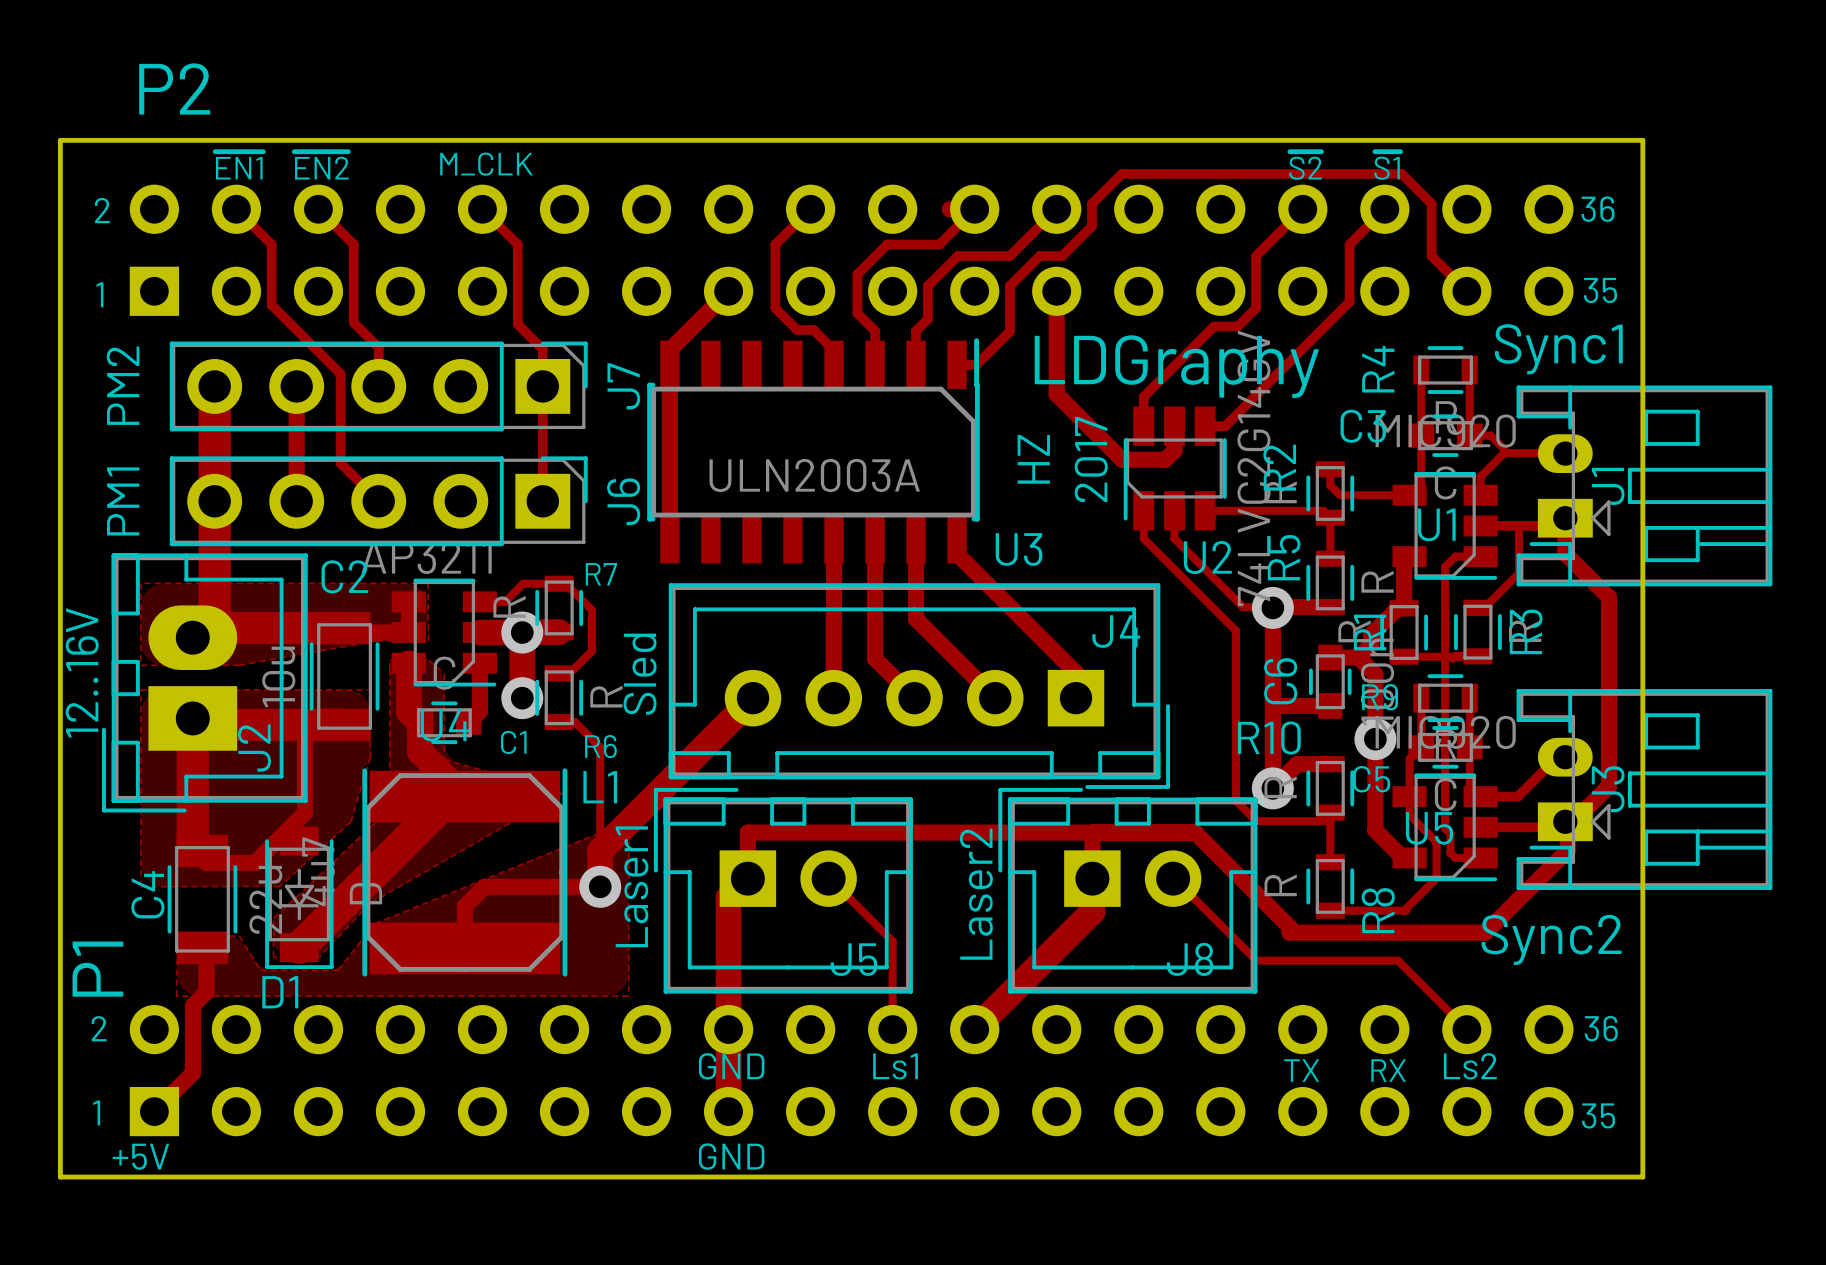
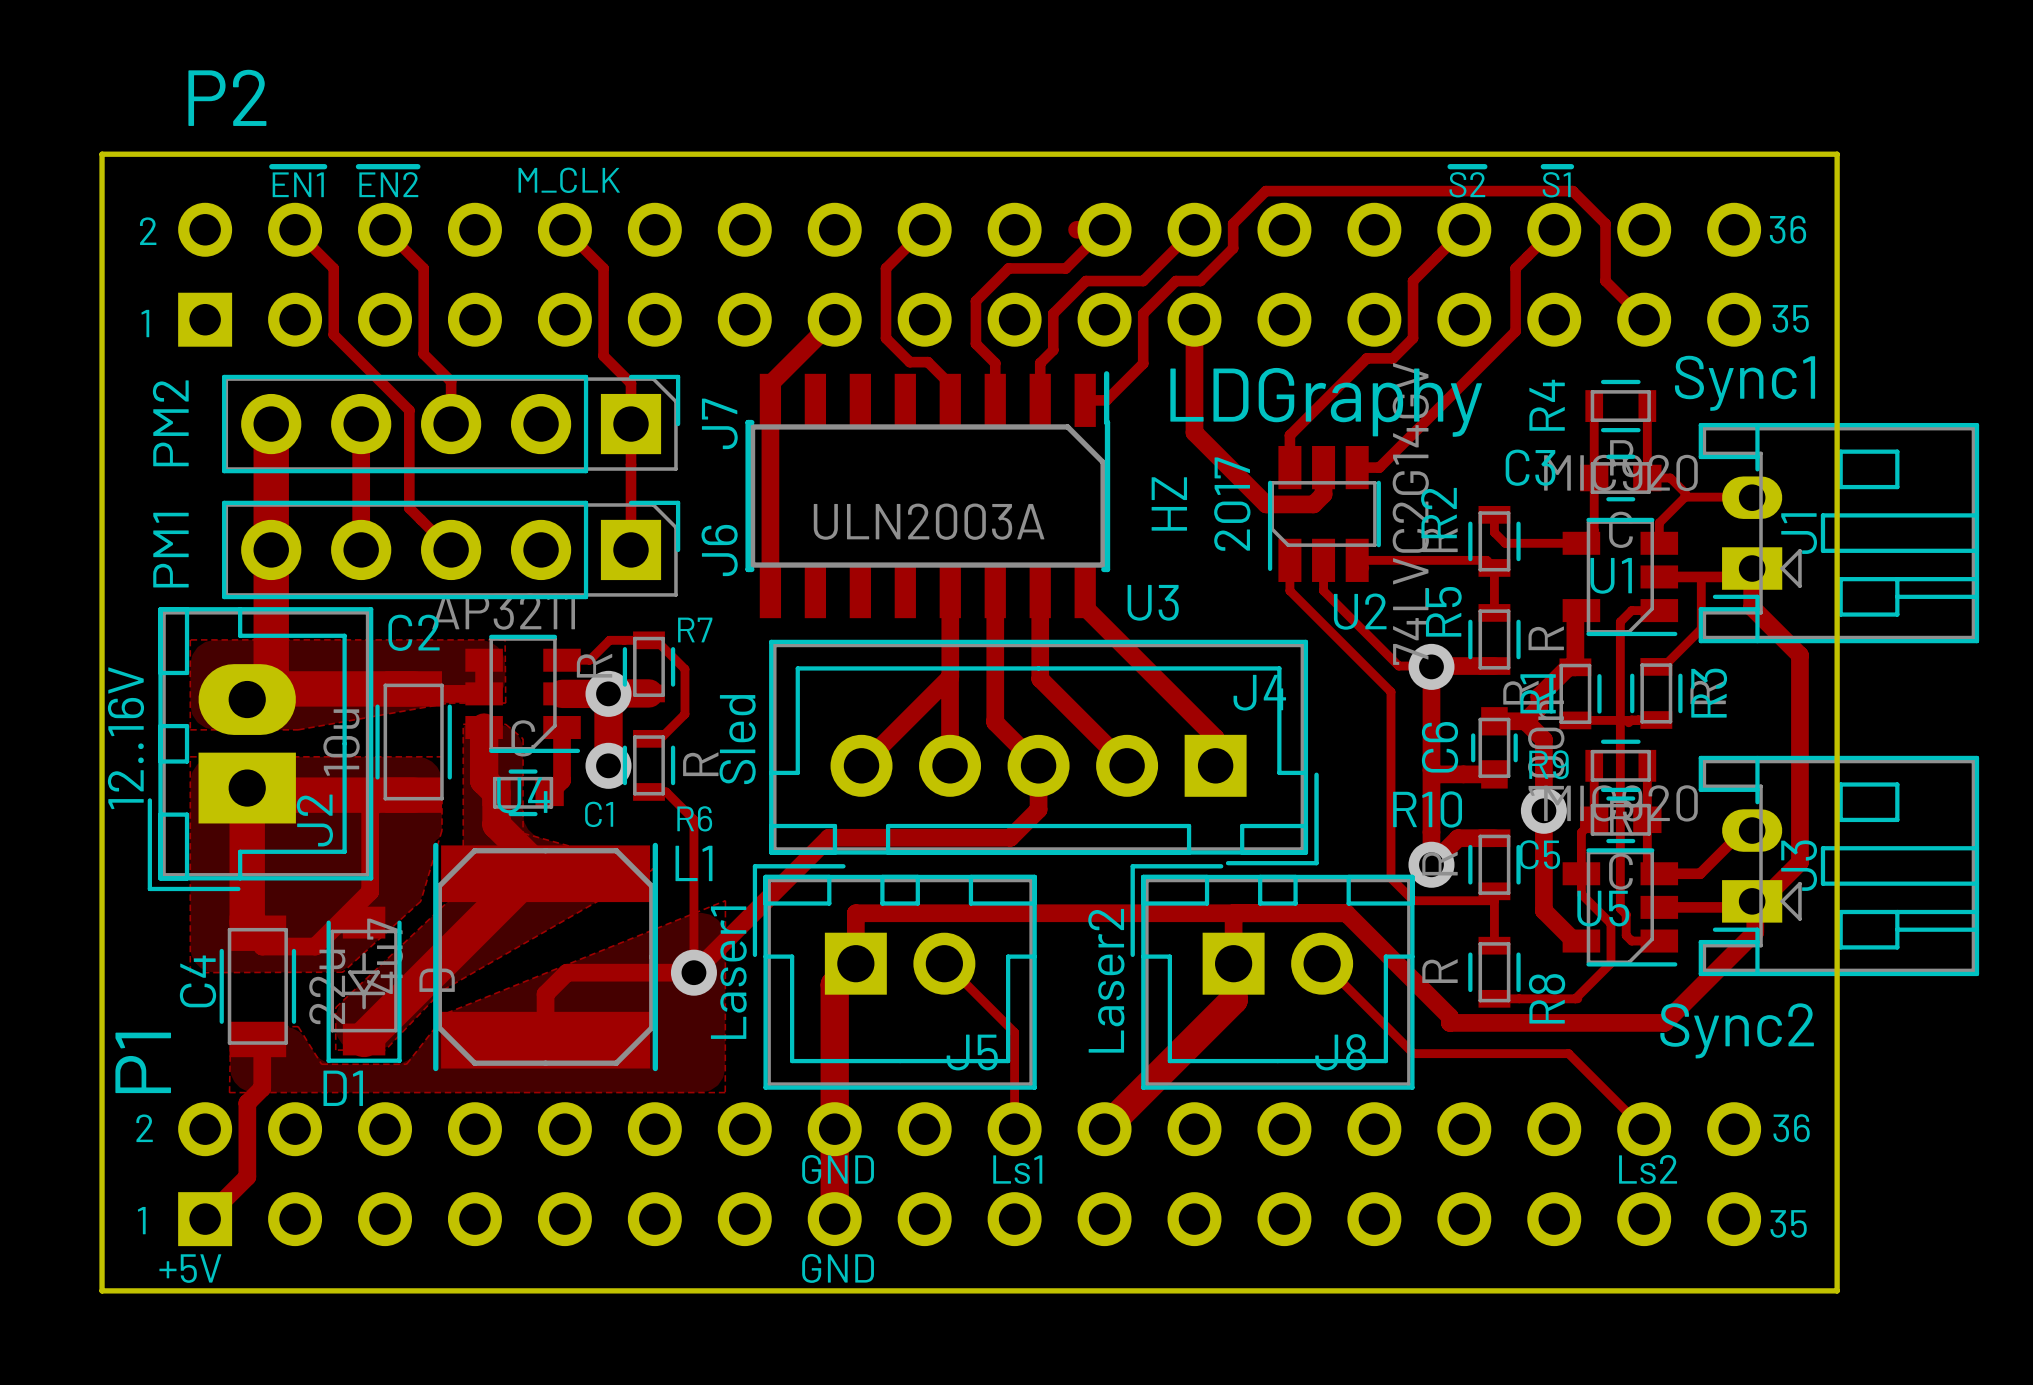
track: none -> (950, 677) (861, 765)
track: (753, 698) (600, 850) (600, 886) -> (1038, 765) (1038, 809) (1010, 837) (828, 837) (693, 972)
text: TX (1301, 1070) -> none
text: RX (1388, 1070) -> none

